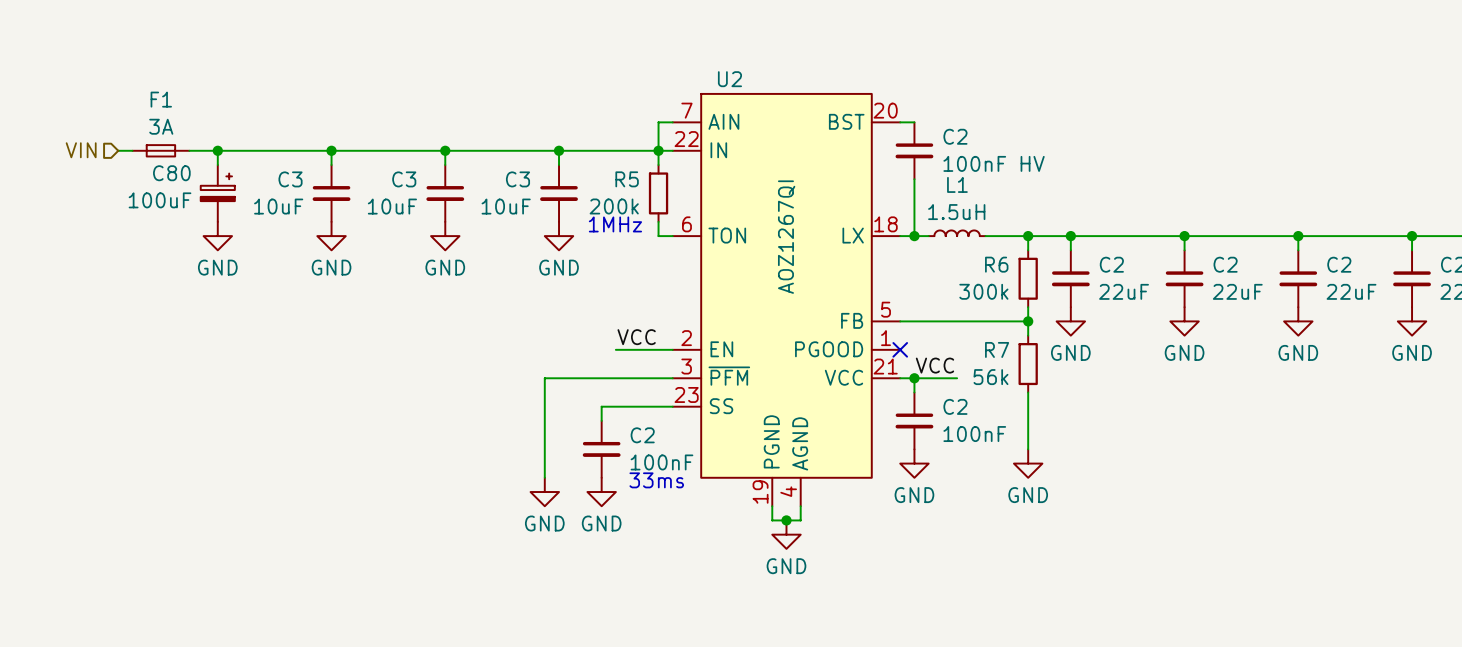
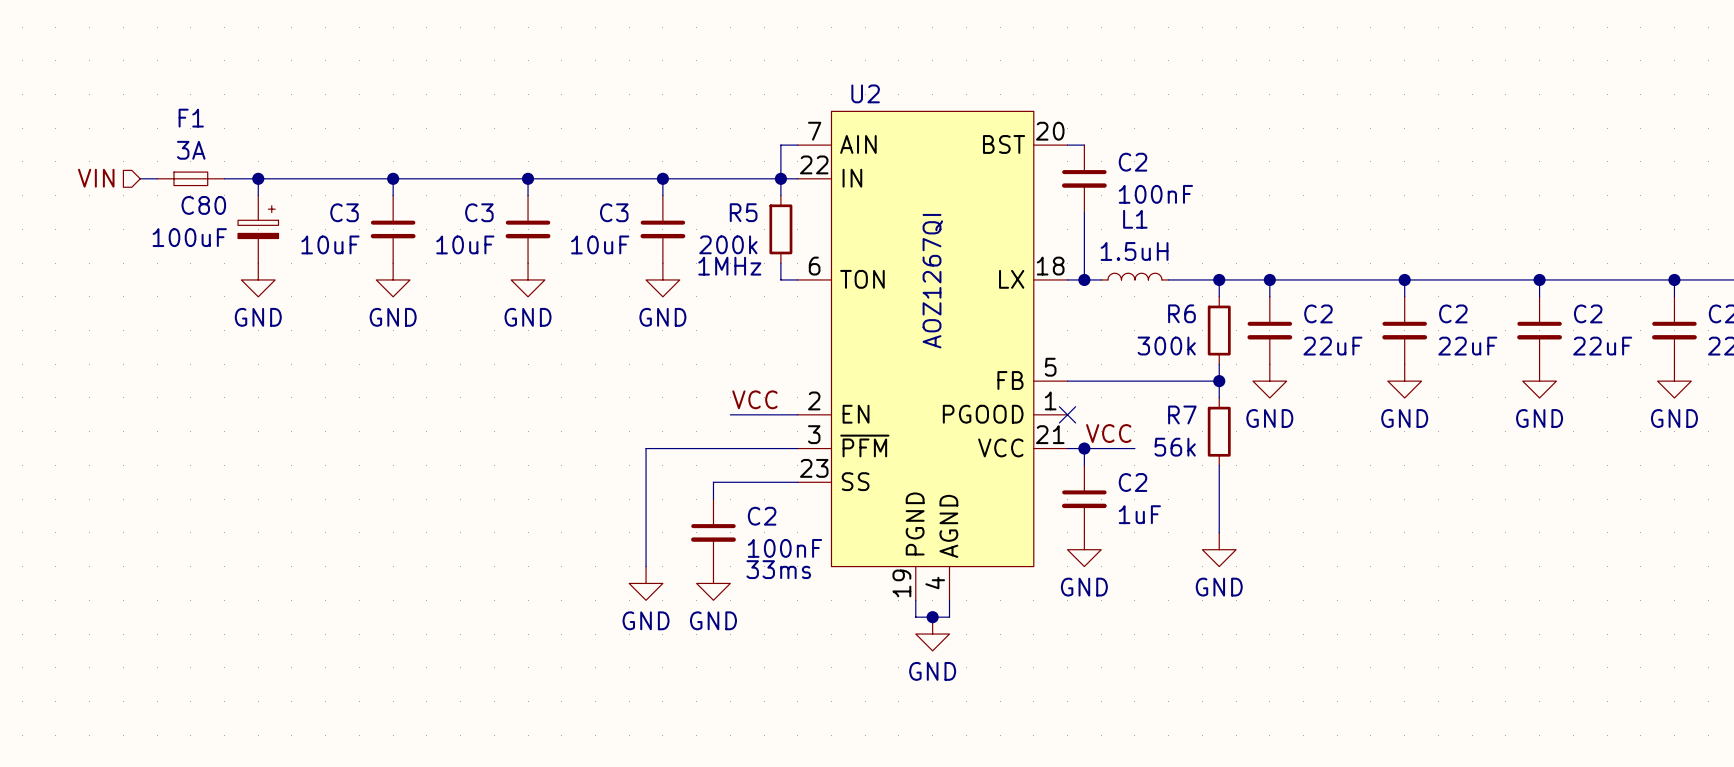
C2 value: 100nF HV (994, 163) -> 100nF (1155, 194)
C2 value: 100nF (974, 434) -> 1uF (1139, 514)

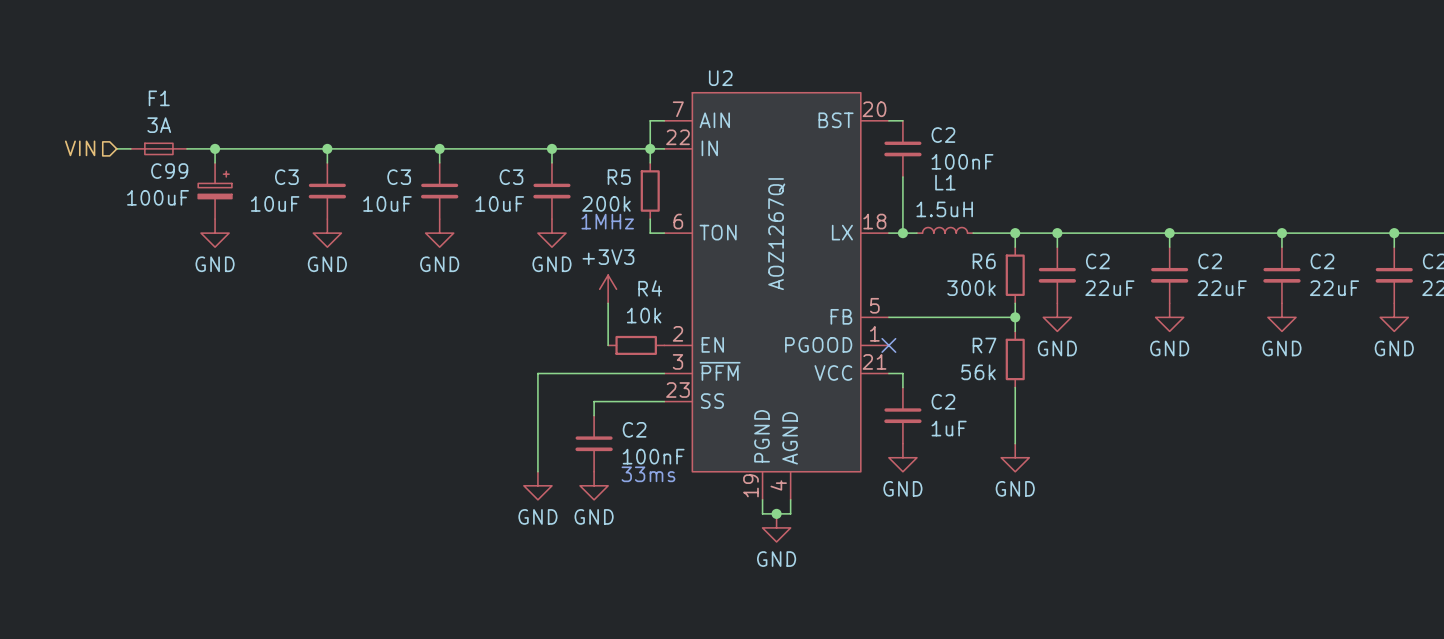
C80 name: C80 (203, 205) -> C99 (169, 171)
power symbol: none -> +3V3 (608, 289)
label: VCC (754, 399) -> none
wire: (730, 414) (797, 414) -> (608, 345) (608, 303)
R4: none -> 10k (636, 345)
label: VCC (1108, 433) -> none
wire: (1084, 448) (1134, 448) -> none
junction: (1084, 448) -> none

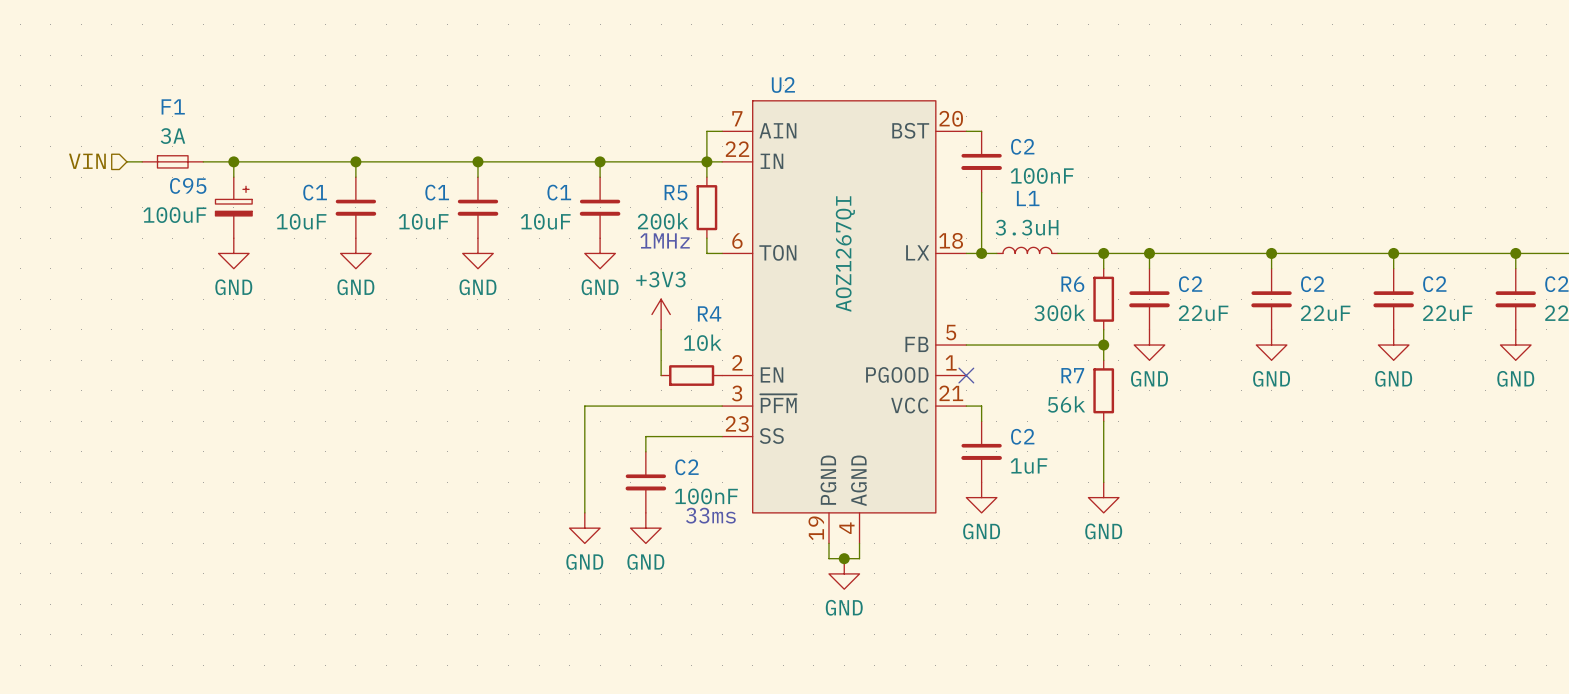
C99 name: C99 (169, 171) -> C95 (188, 185)
C3 name: C3 (286, 177) -> C1 (315, 192)
C3 name: C3 (399, 177) -> C1 (437, 192)
C3 name: C3 (511, 177) -> C1 (559, 192)
L1 value: 1.5uH (944, 209) -> 3.3uH (1027, 227)

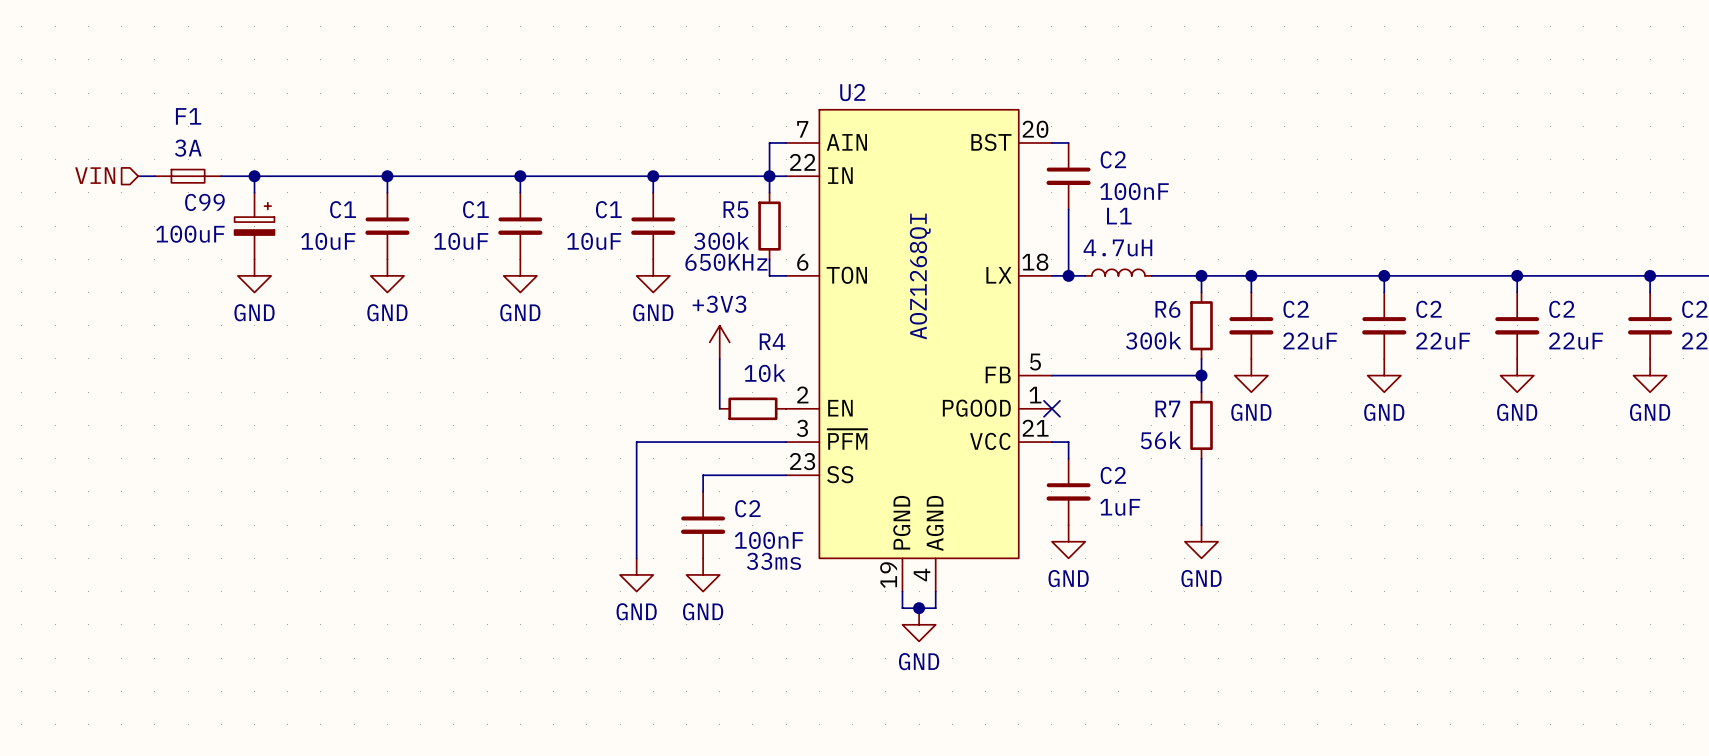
C95 name: C95 (188, 185) -> C99 (204, 202)
R5 value: 200k (663, 221) -> 300k (721, 240)
L1 value: 3.3uH (1027, 227) -> 4.7uH (1117, 247)
text: 1MHz (665, 240) -> none
text: none -> 650KHz (726, 262)
U2 value: AOZ1267QI (845, 254) -> AOZ1268QI (920, 276)

